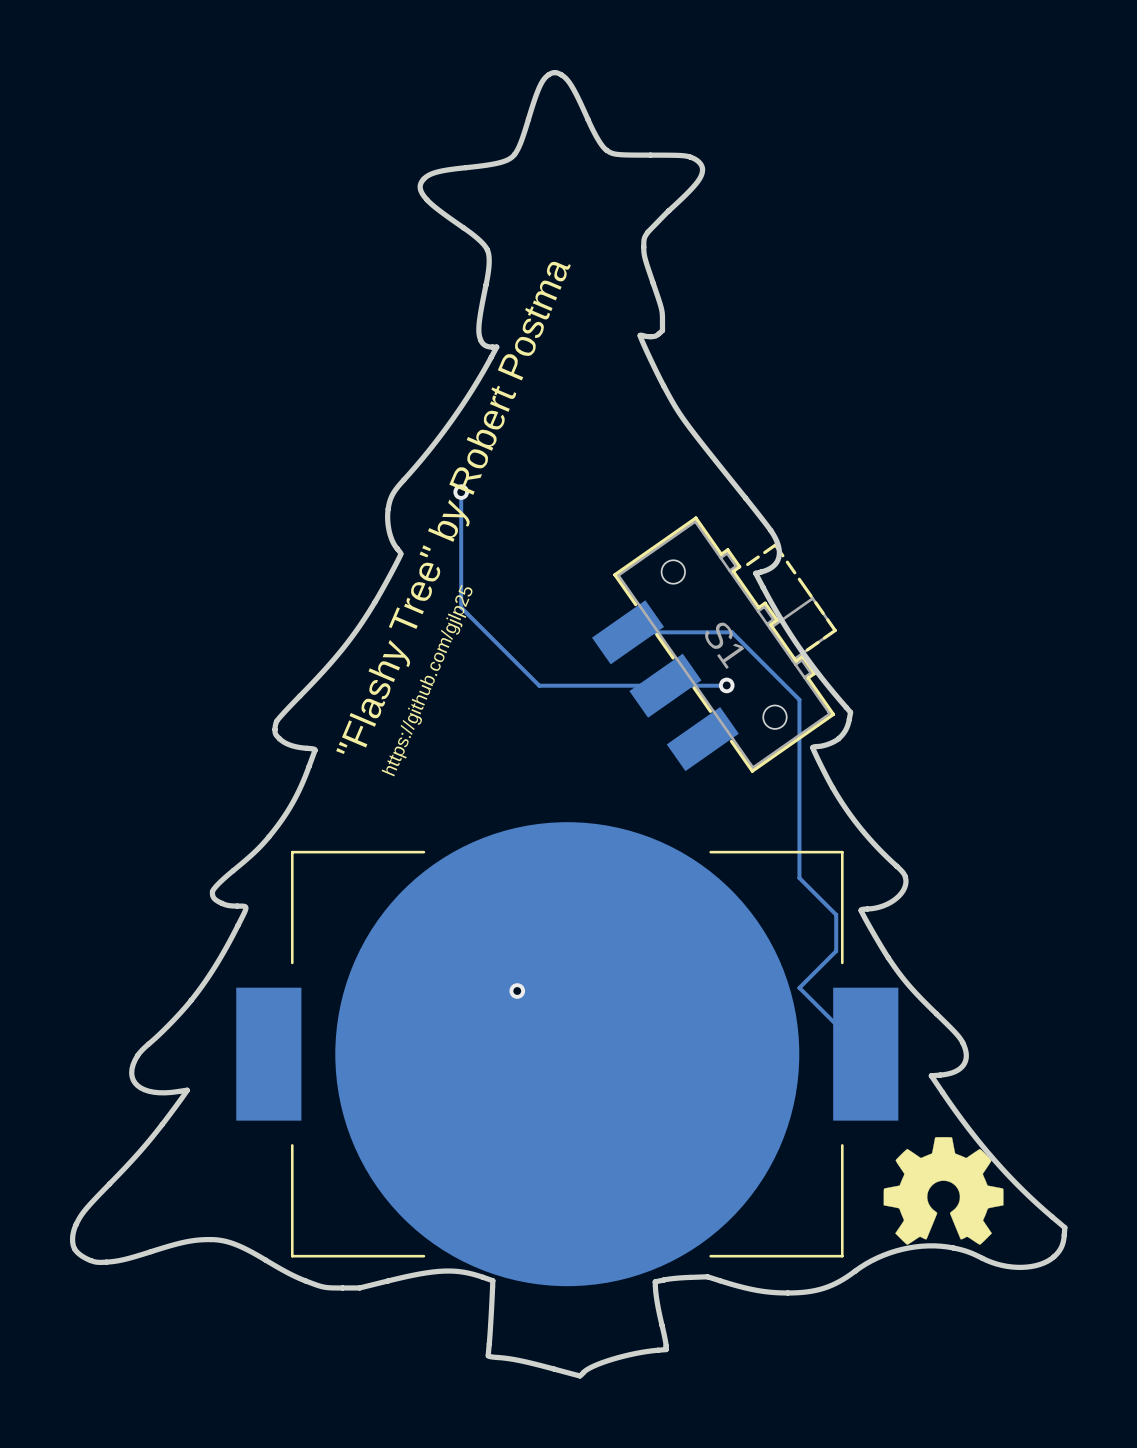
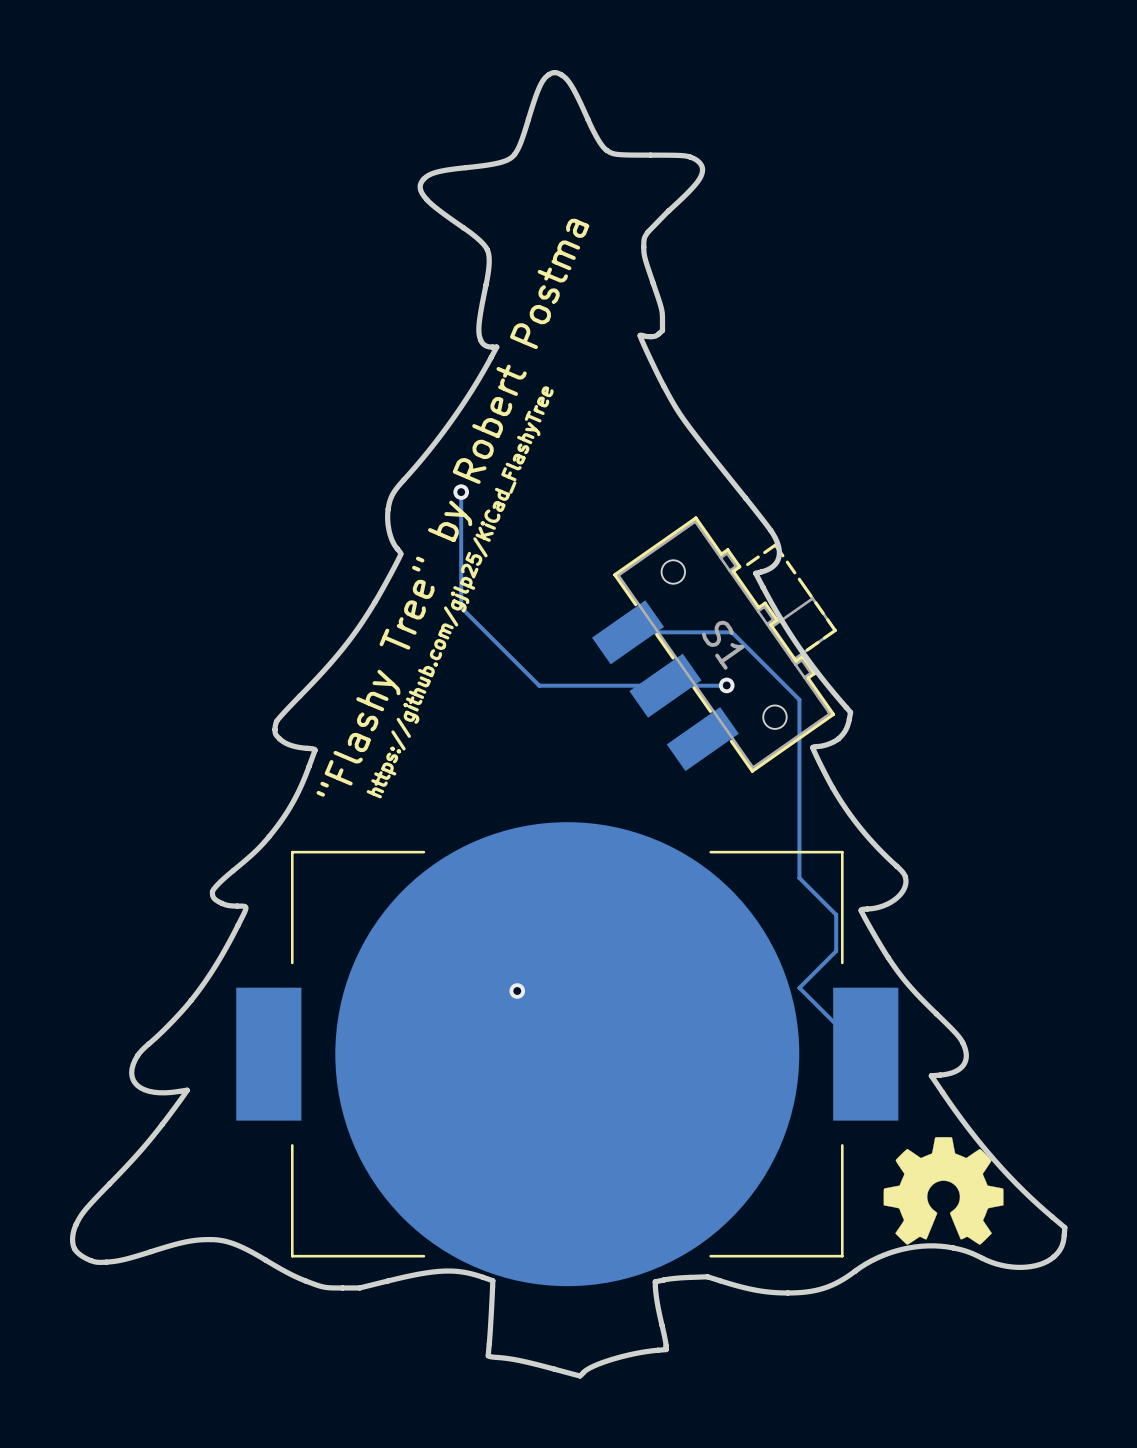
text: https://github.com/gjlp25 (427, 680) -> https://github.com/gjlp25/KiCad_FlashyTree (460, 592)

